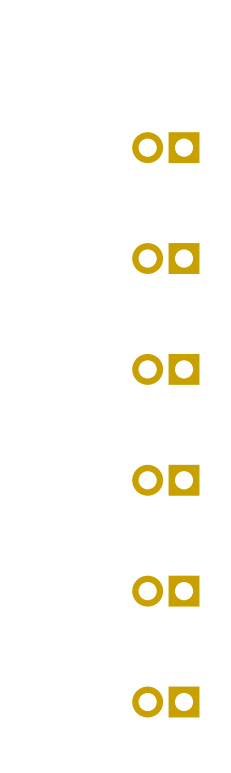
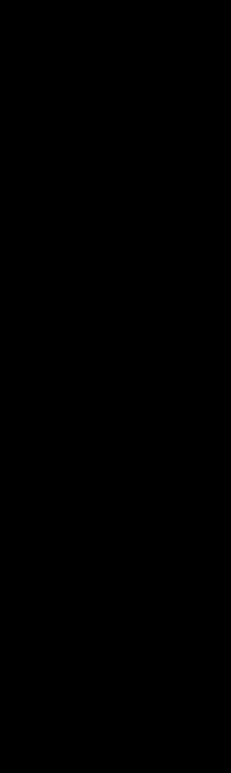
part: (165, 147) -> none
part: (165, 258) -> none
part: (165, 369) -> none
part: (165, 480) -> none
part: (165, 591) -> none
part: (165, 702) -> none

